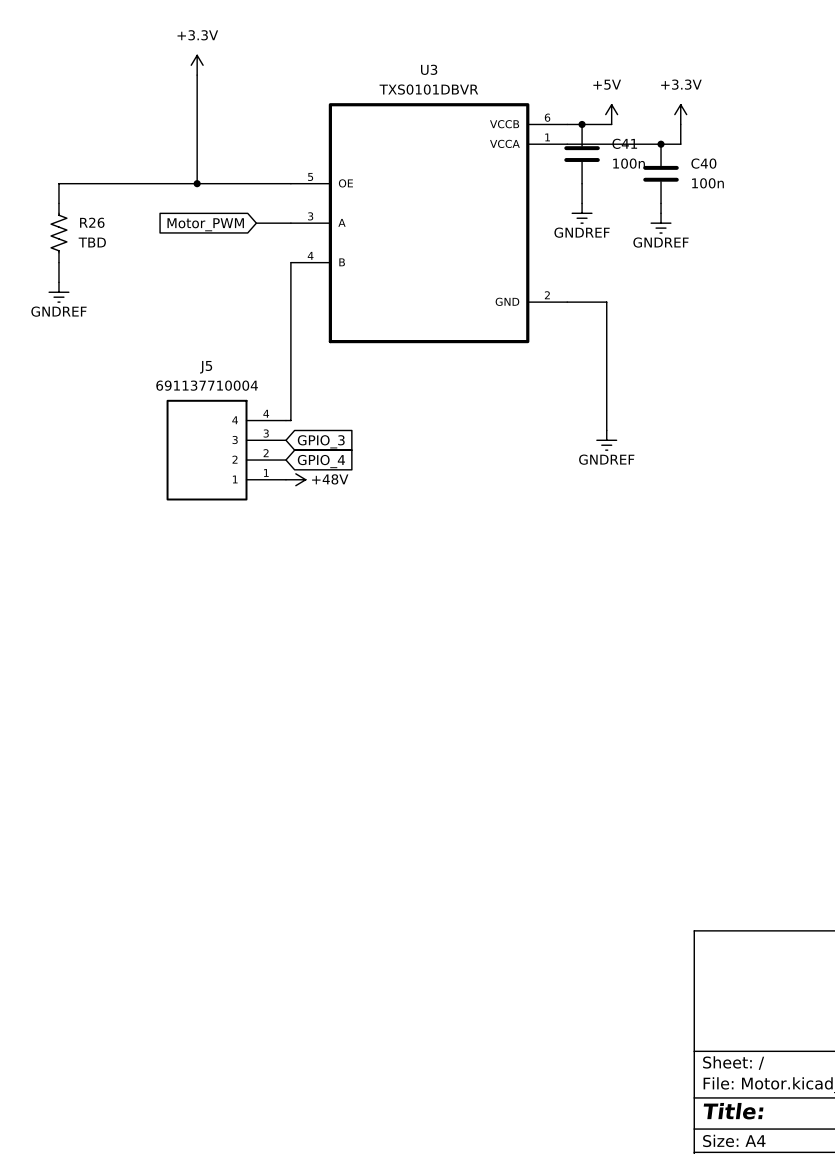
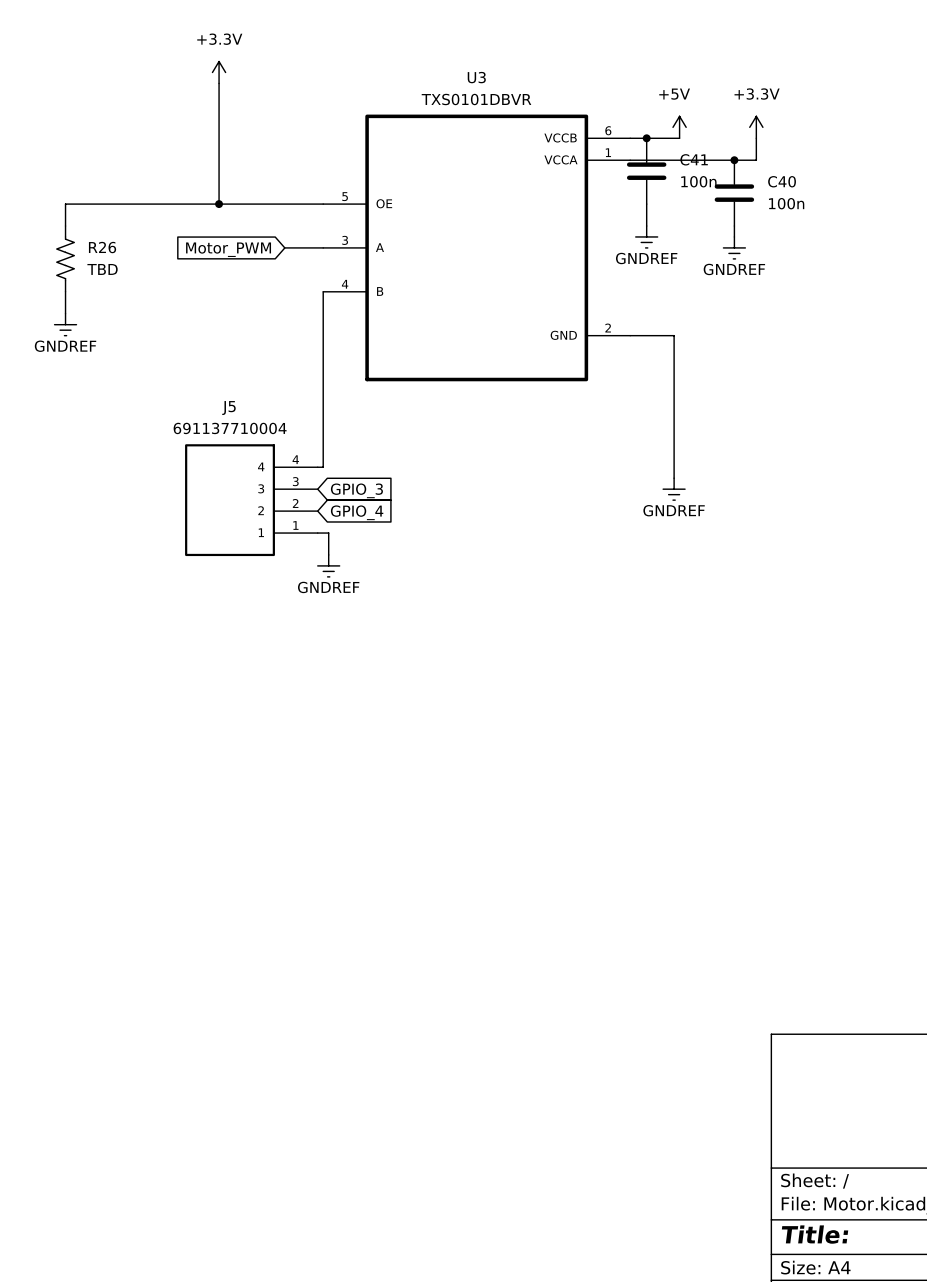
wire: none -> (317, 533) (328, 533) (328, 554)
power symbol: +48V (295, 479) -> none
power symbol: none -> GNDREF (328, 565)

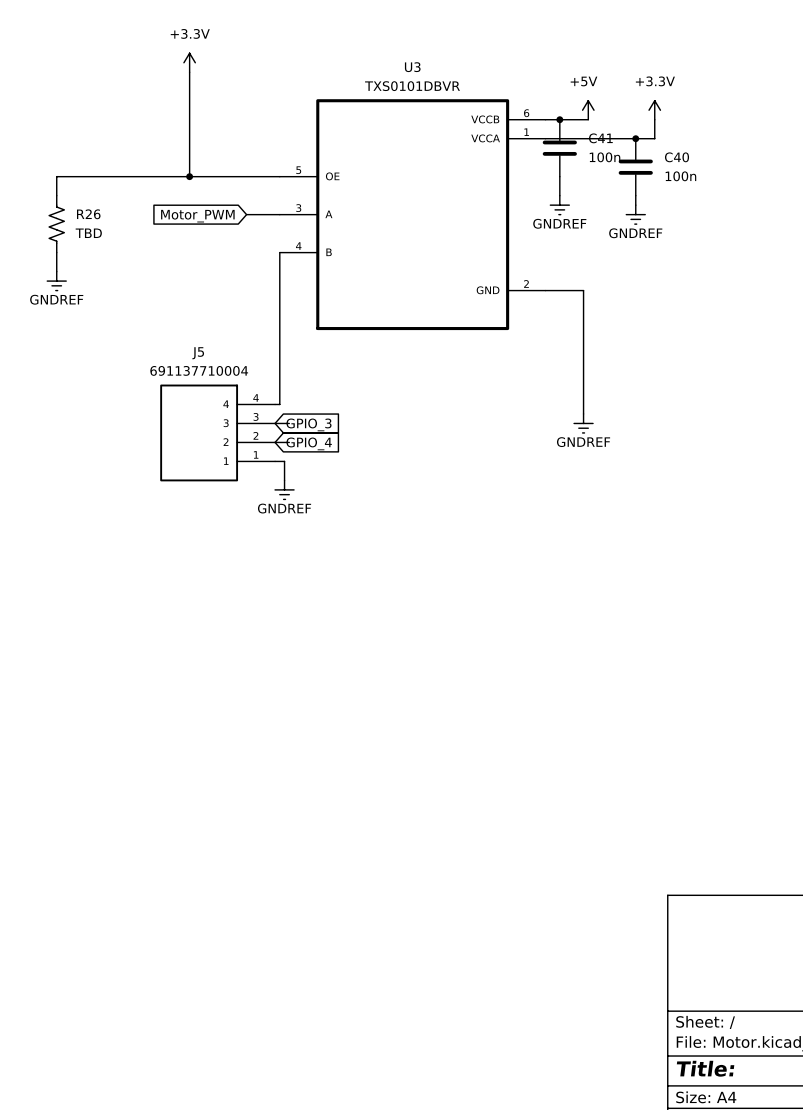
wire: none -> (275, 423) (289, 423)
wire: none -> (275, 442) (289, 442)

